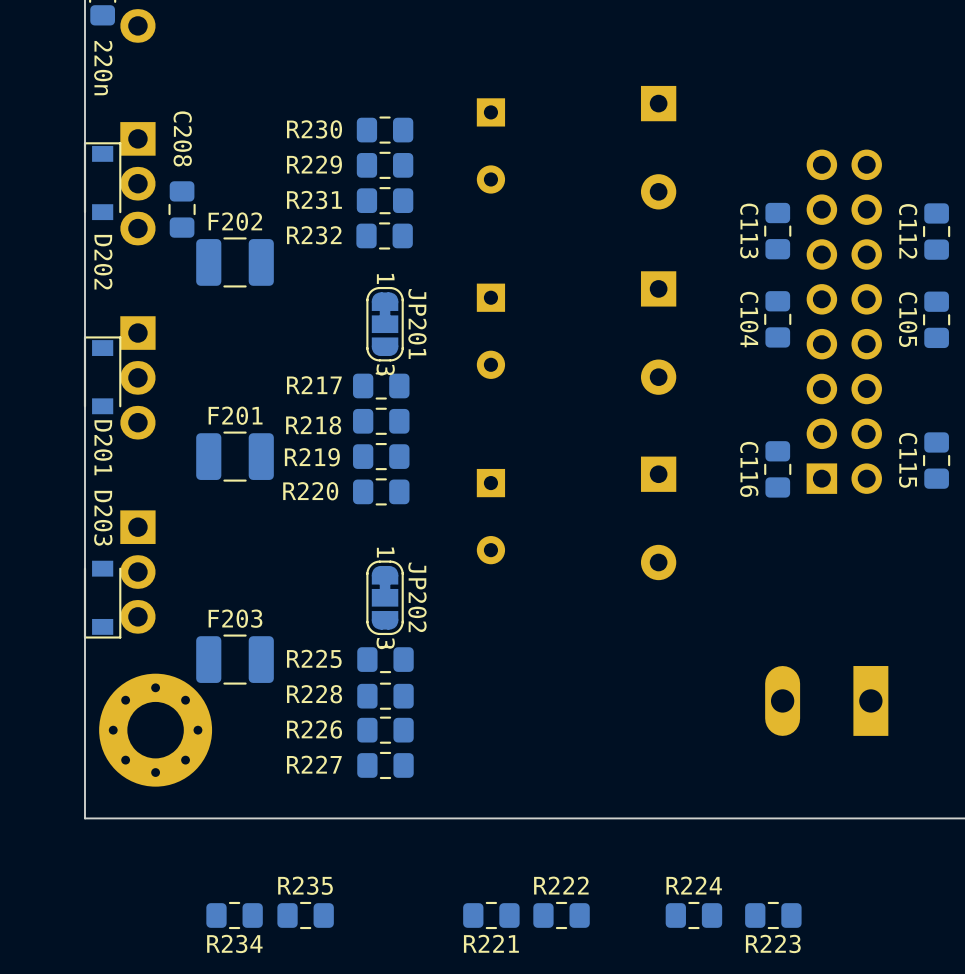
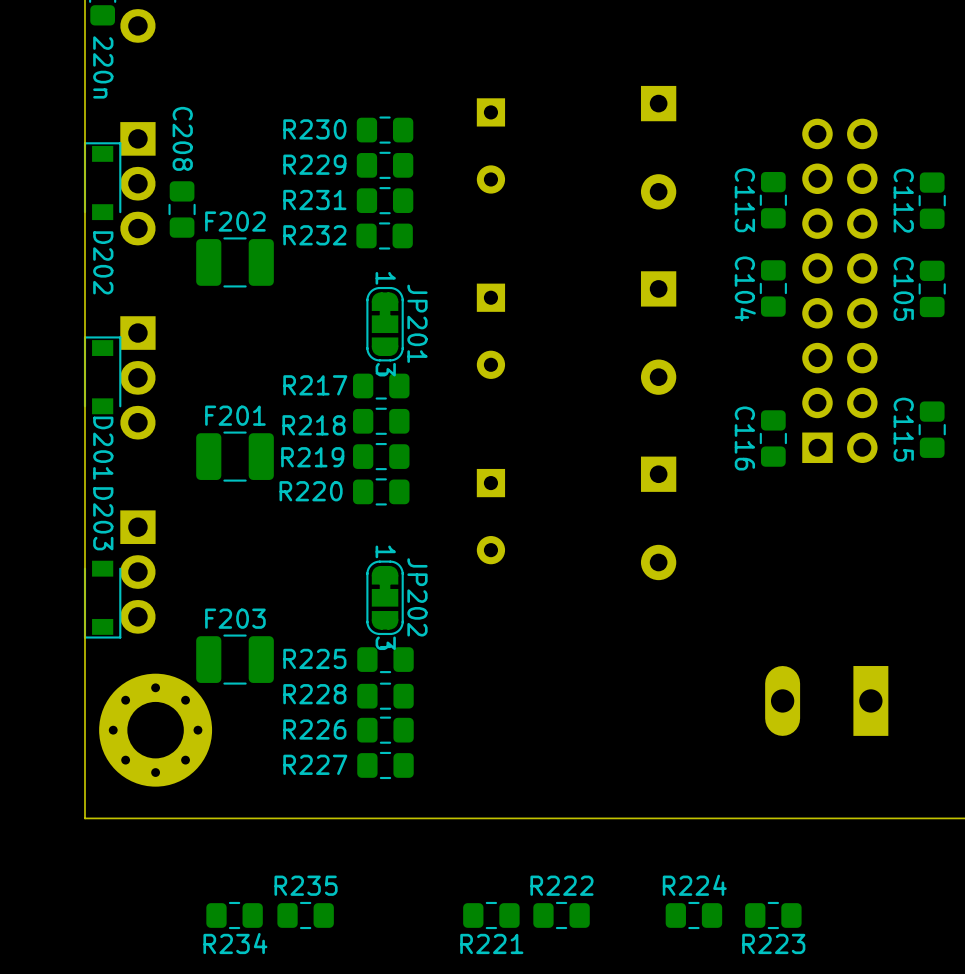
C113 position: (777, 231) -> (773, 200)
C112 position: (936, 231) -> (932, 200)
C104 position: (777, 319) -> (773, 288)
C105 position: (936, 319) -> (932, 288)
part position: (844, 321) -> (839, 290)
C115 position: (936, 460) -> (932, 429)
C116 position: (777, 469) -> (773, 438)

